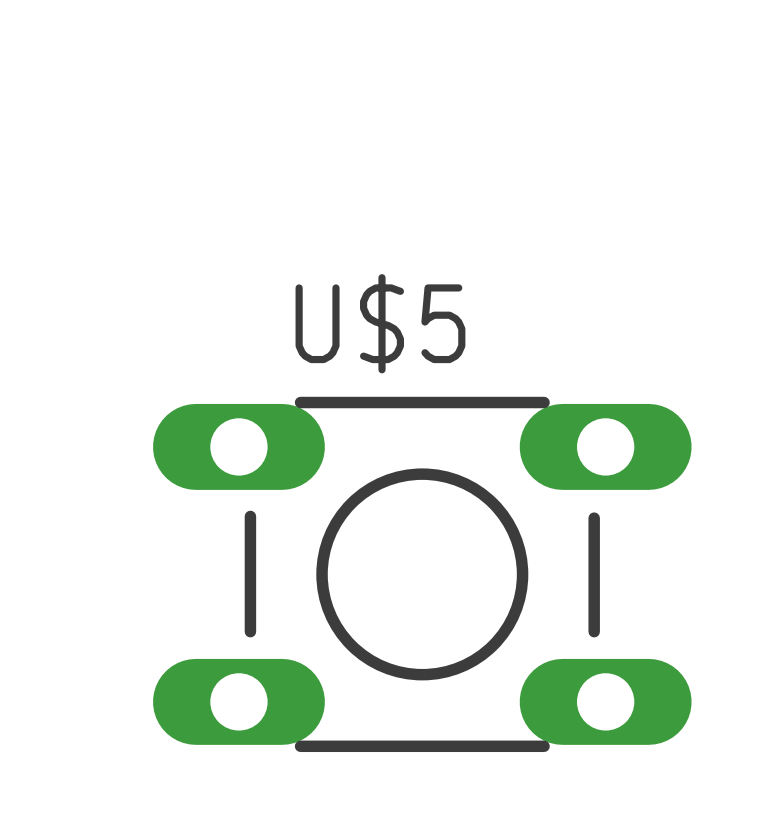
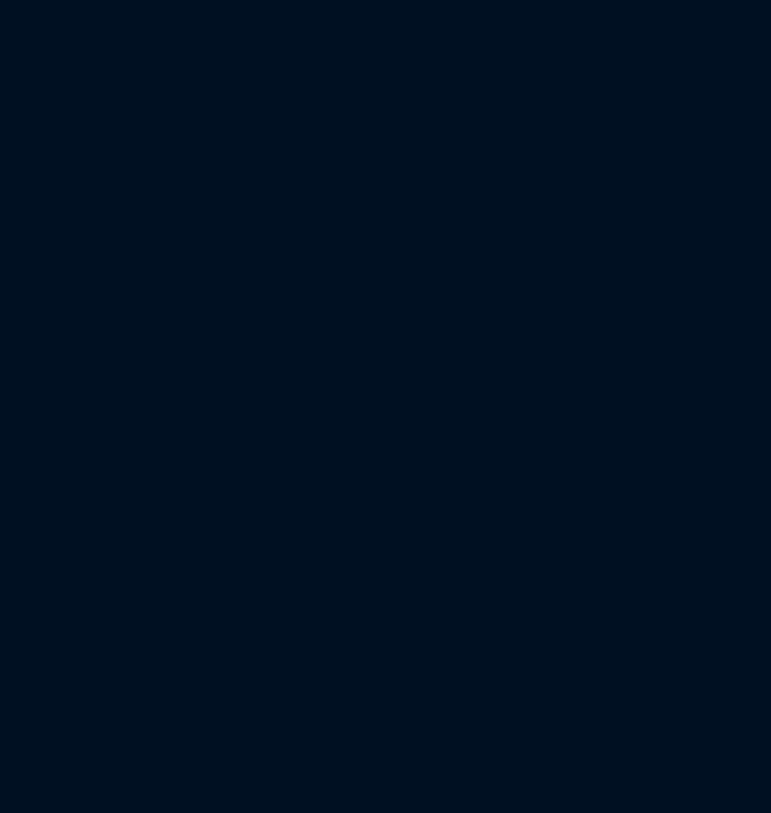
U$5: (422, 574) -> none

